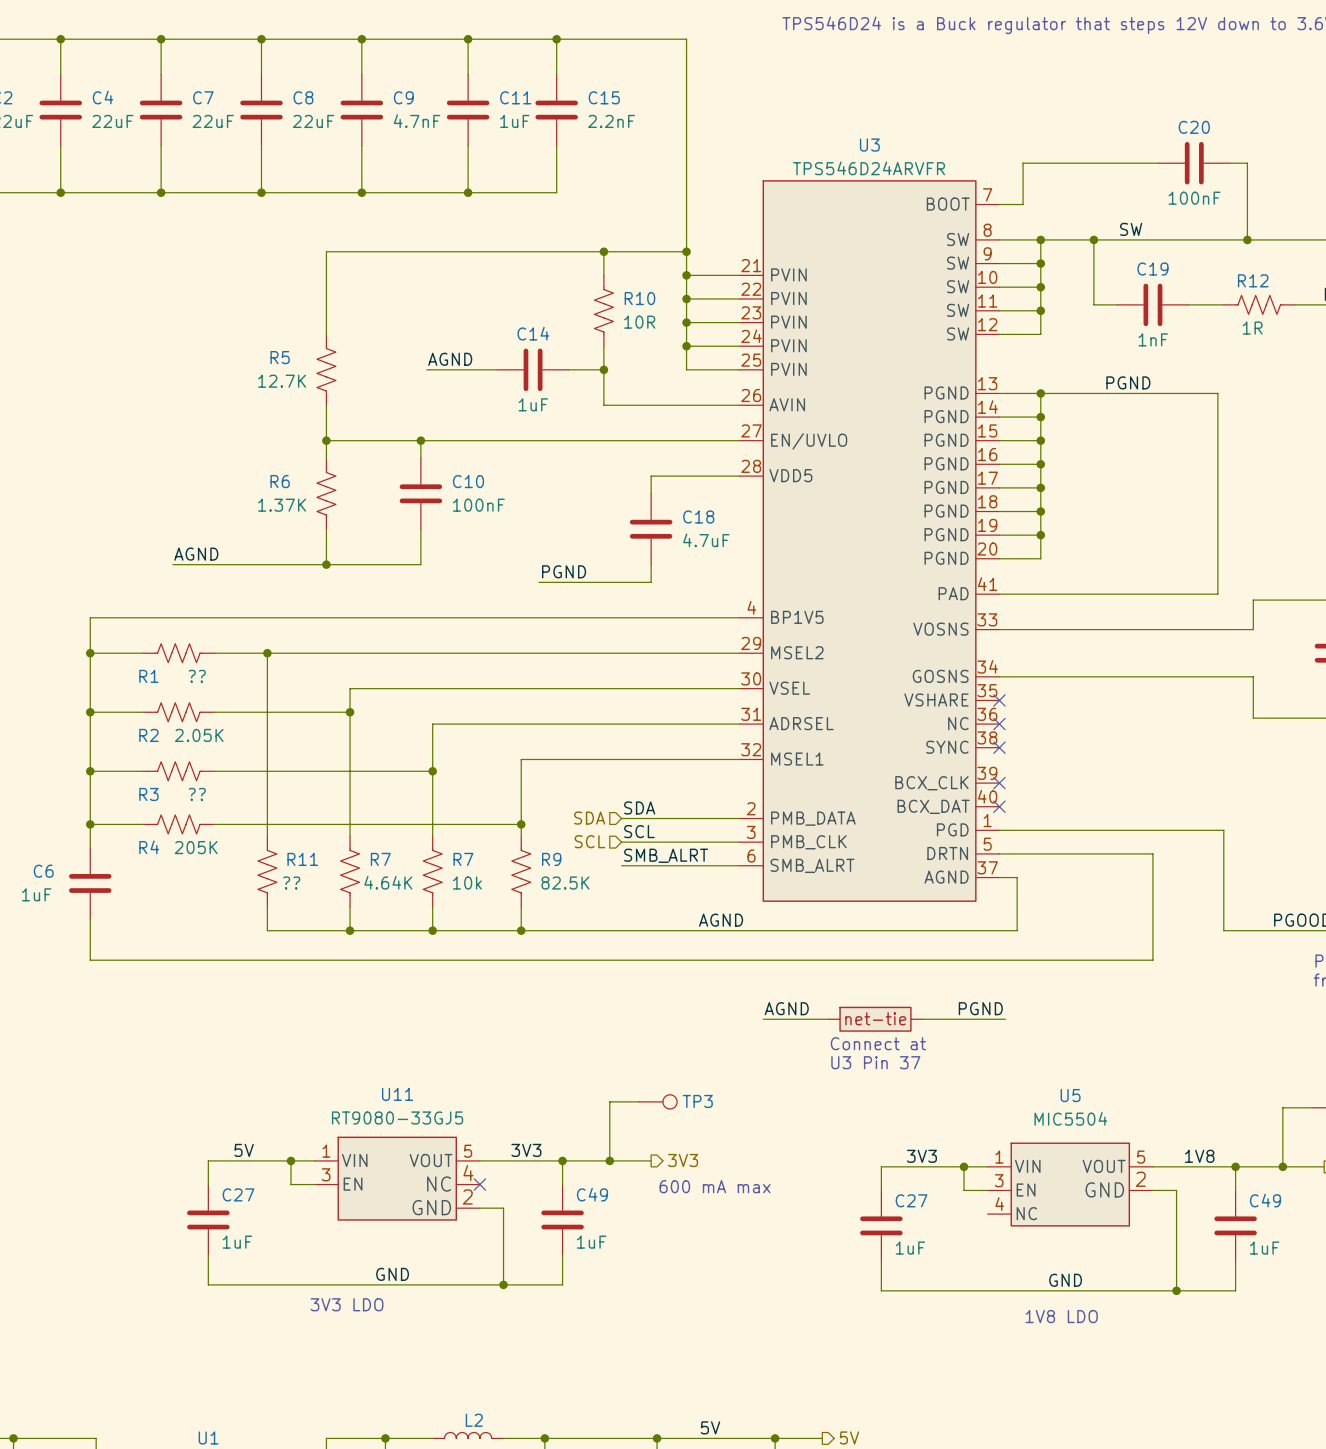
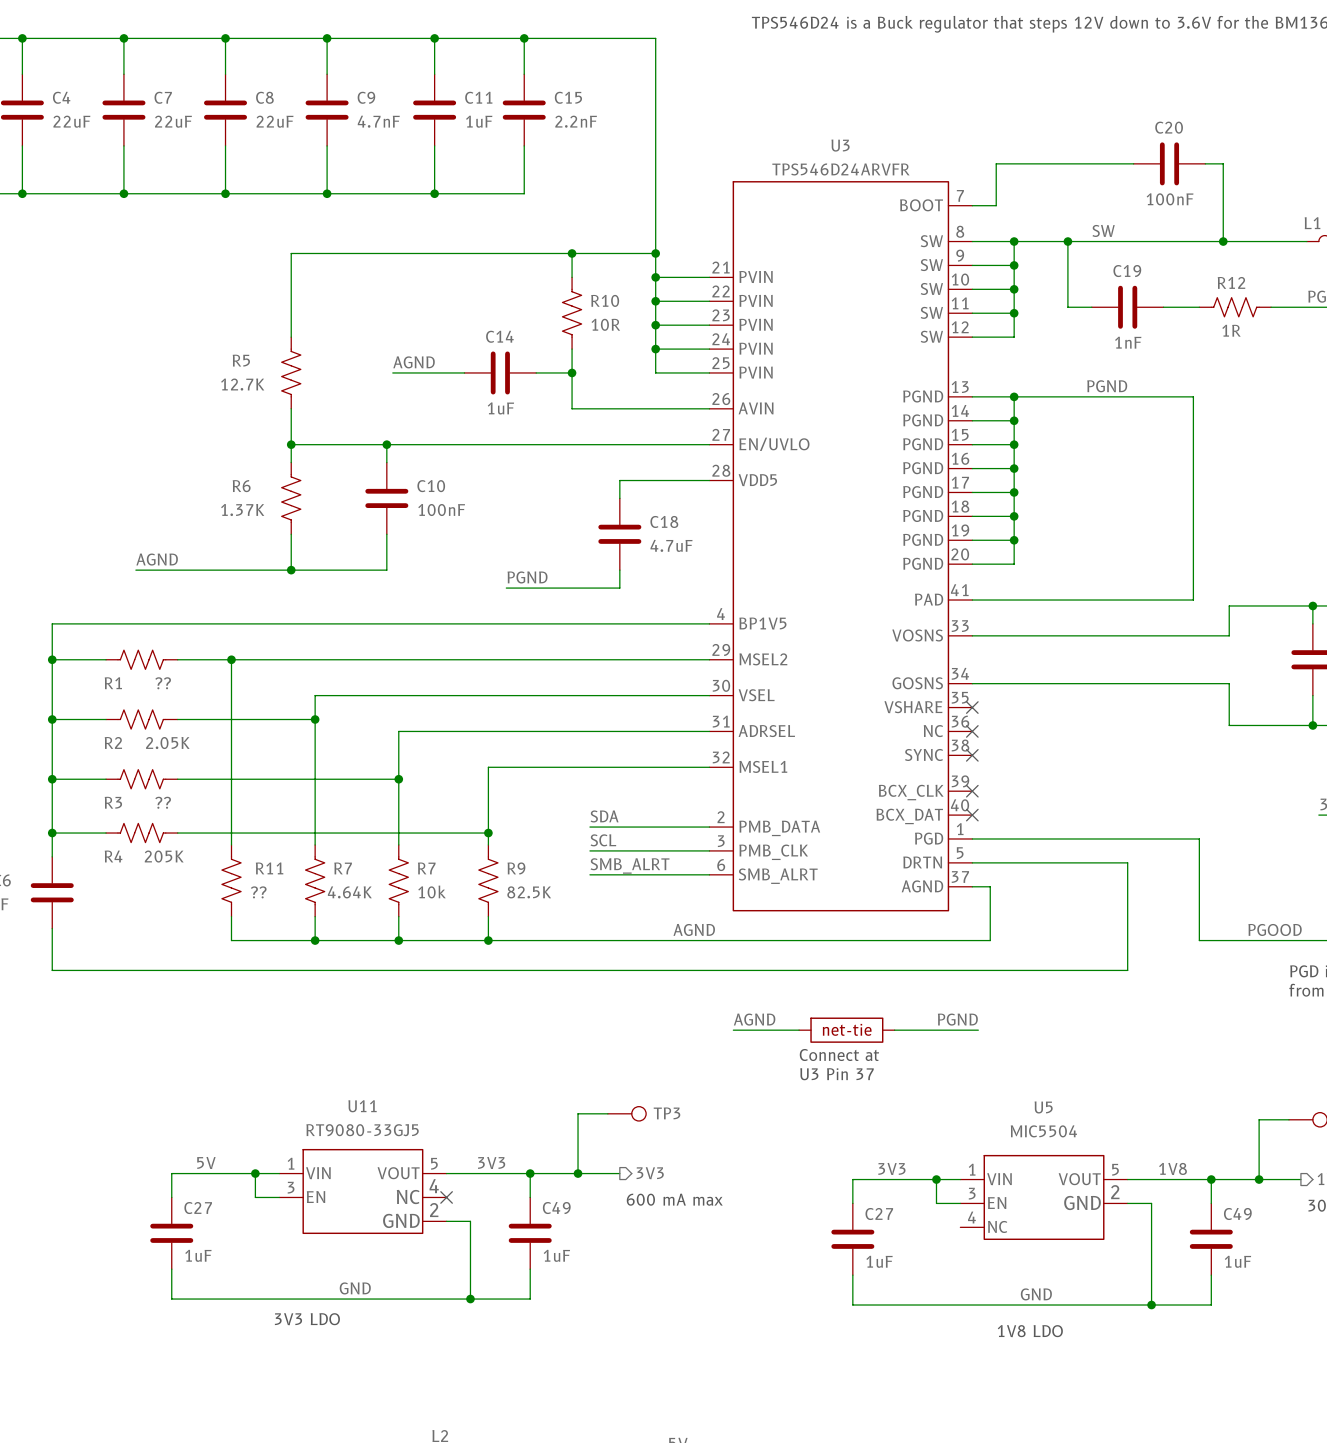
hierarchical label: SDA (589, 818) -> none
hierarchical label: SCL (589, 841) -> none

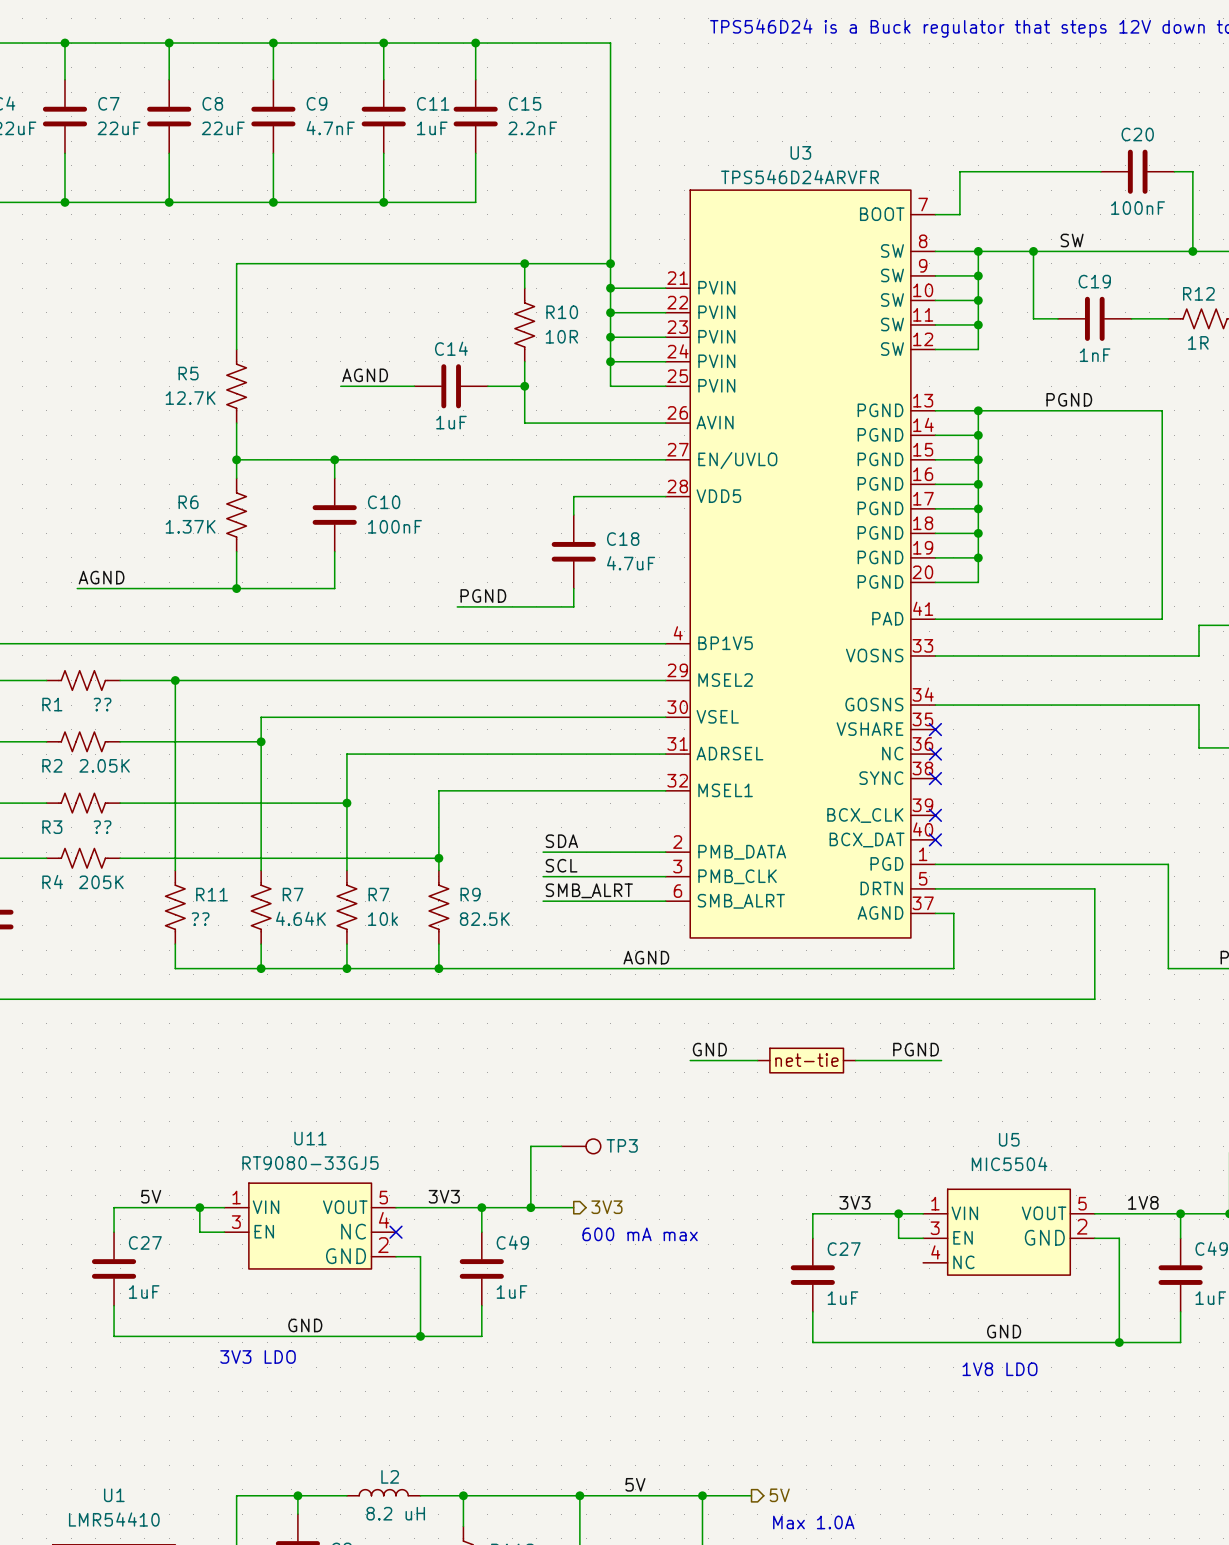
label: AGND (754, 1019) -> GND (709, 1049)
text: Connect at (839, 1055) -> none
text: U3 Pin 37 (837, 1074) -> none

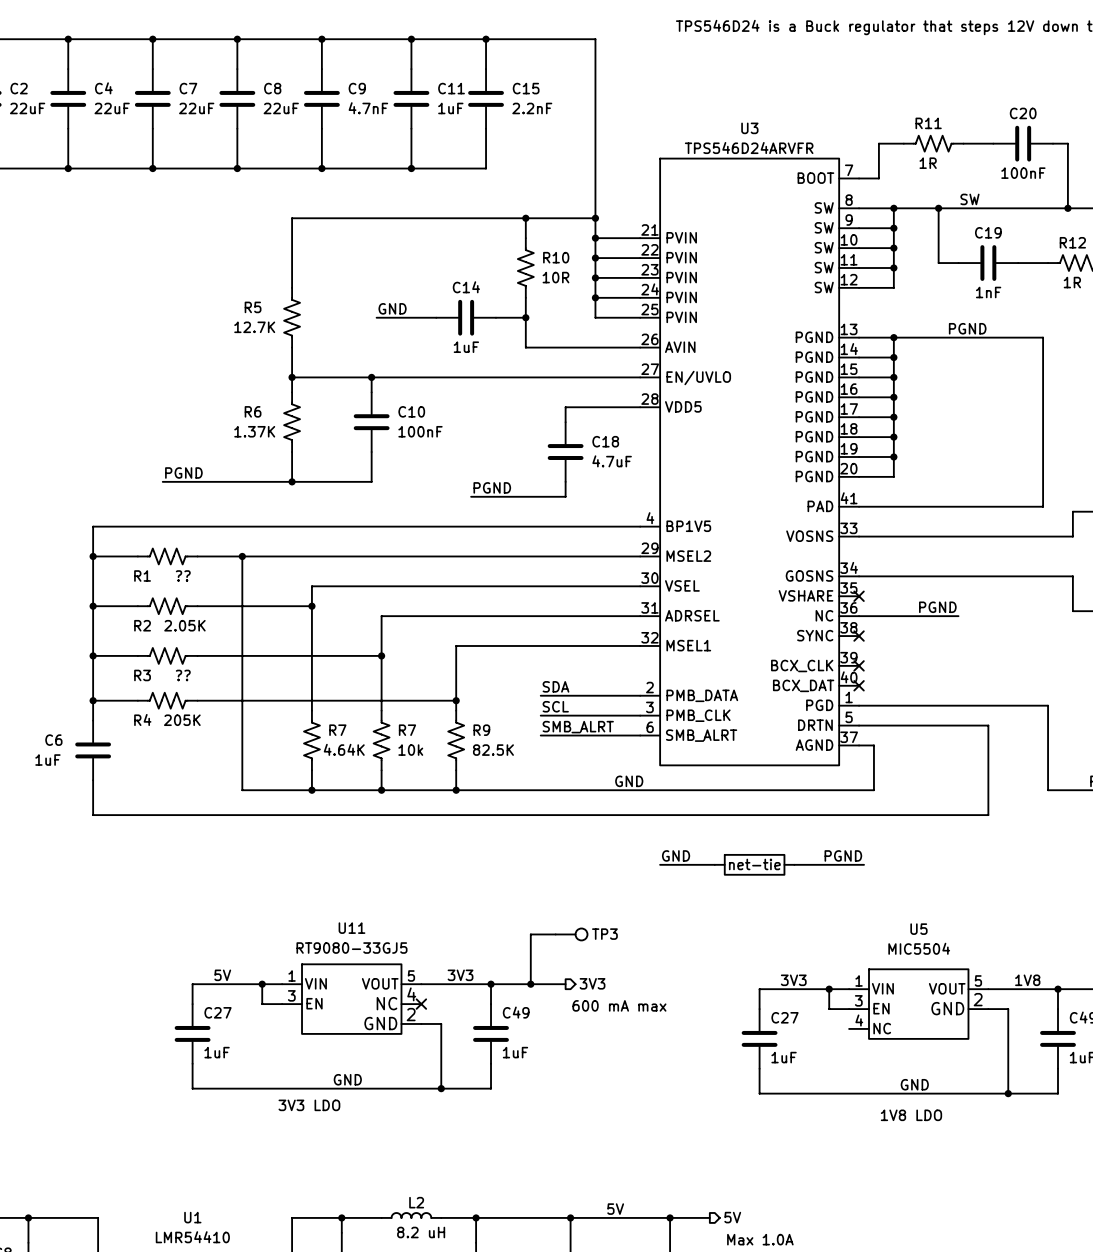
label: AGND (365, 375) -> GND (392, 308)
label: AGND (101, 577) -> PGND (183, 472)
label: none -> PGND (937, 607)
wire: none -> (859, 616) (958, 616)
no-connect mark: (935, 754) -> none
R11 name position: R11 (212, 894) -> R11 (928, 123)
R11 rotation: 0° (175, 907) -> 90° clockwise (933, 143)
R11 position: (175, 907) -> (933, 143)
R11 value: ?? (200, 919) -> 1R (928, 163)
label: AGND (646, 957) -> GND (629, 781)

